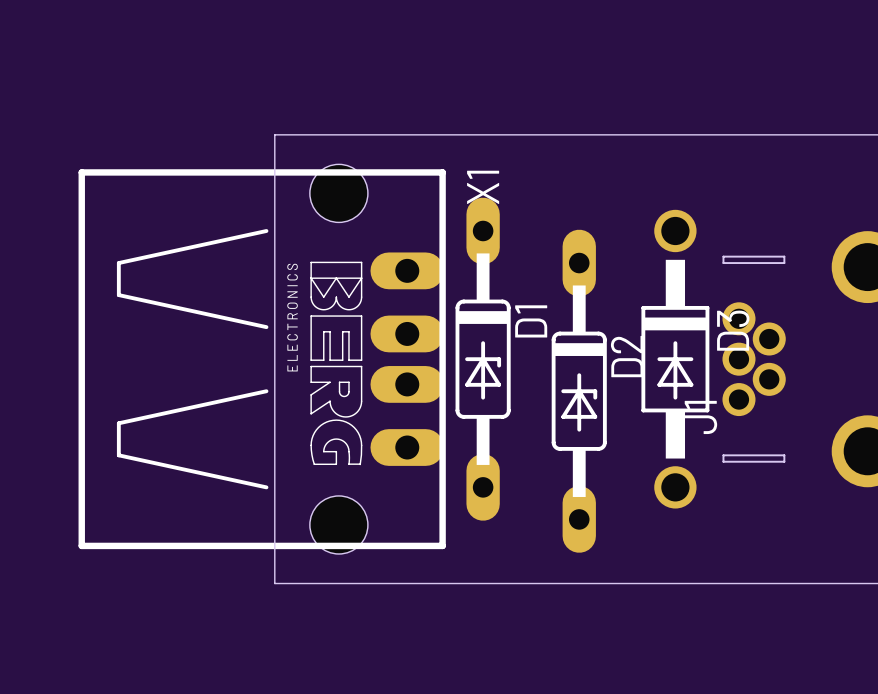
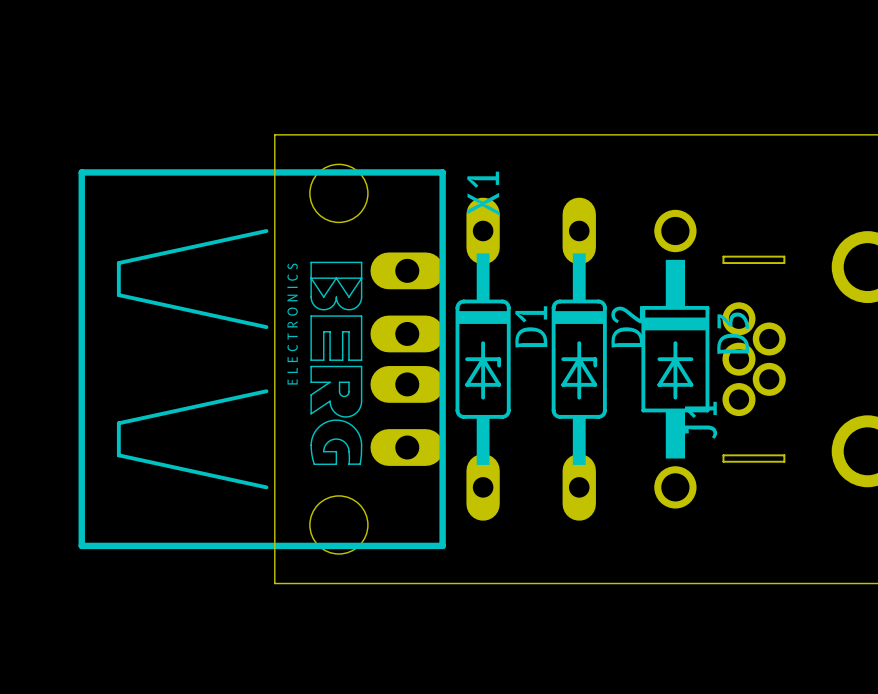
D2 position: (579, 391) -> (579, 359)

